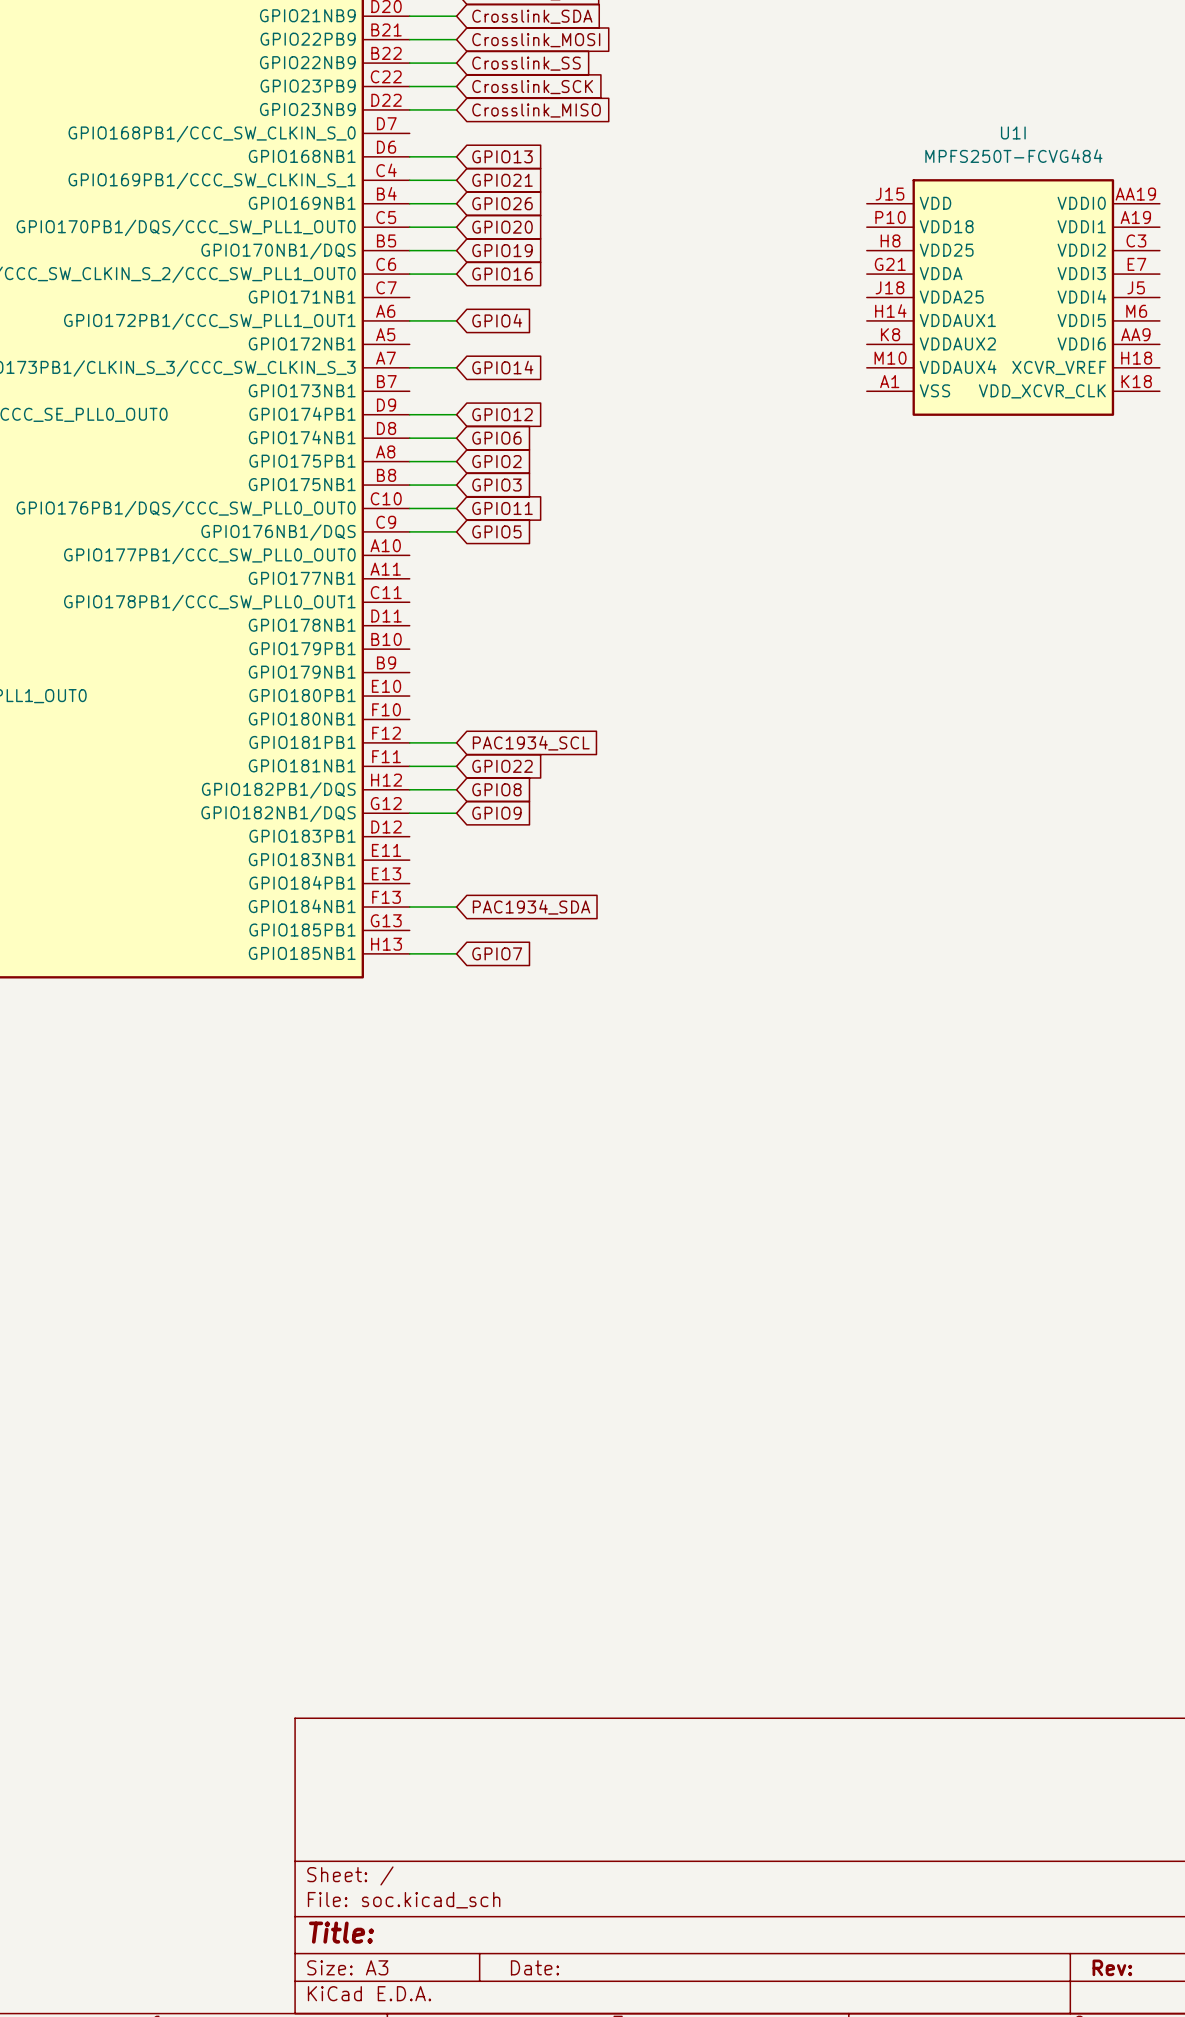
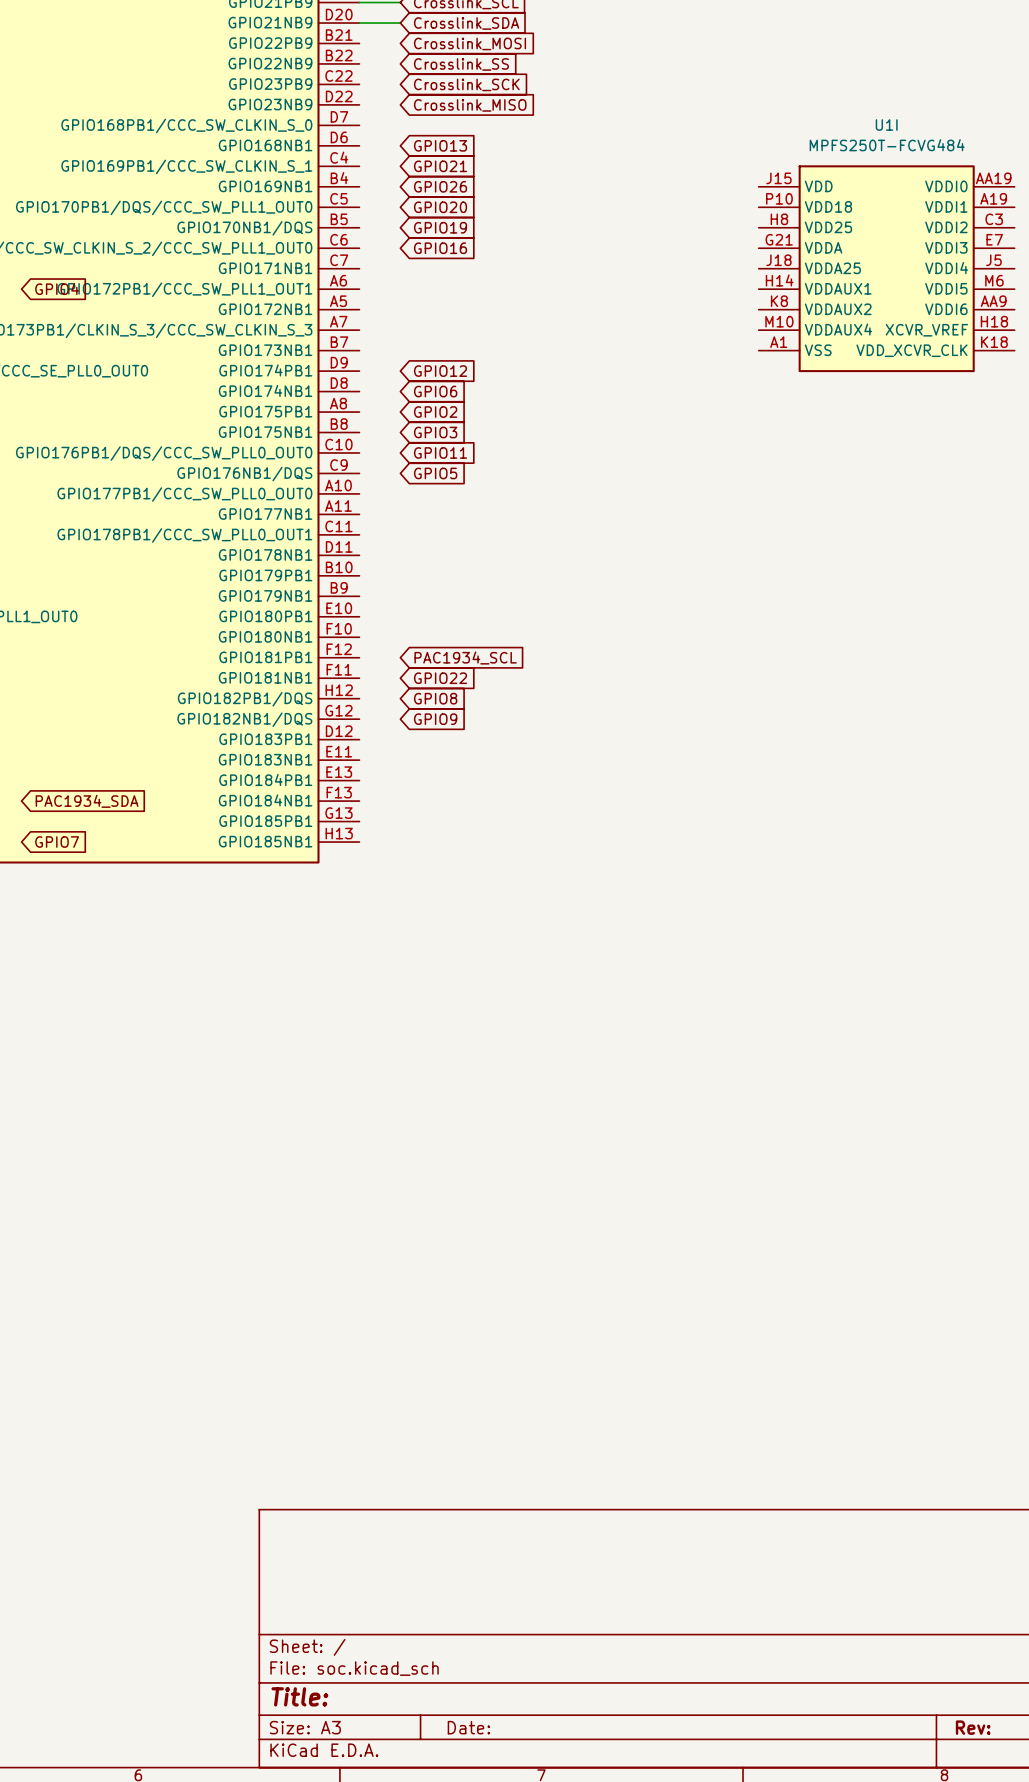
wire: (409, 39) (456, 39) -> none
wire: (409, 63) (456, 63) -> none
wire: (409, 86) (456, 86) -> none
wire: (409, 109) (456, 109) -> none
wire: (409, 156) (456, 156) -> none
wire: (409, 180) (456, 180) -> none
wire: (409, 203) (456, 203) -> none
wire: (409, 227) (456, 227) -> none
wire: (409, 250) (456, 250) -> none
wire: (409, 274) (456, 274) -> none
global label: none -> GPIO4 (57, 288)
wire: (409, 320) (456, 320) -> none
global label: GPIO4 (497, 320) -> none
wire: (409, 367) (456, 367) -> none
global label: GPIO14 (502, 367) -> none
wire: (409, 414) (456, 414) -> none
wire: (409, 438) (456, 438) -> none
wire: (409, 461) (456, 461) -> none
wire: (409, 485) (456, 485) -> none
wire: (409, 508) (456, 508) -> none
wire: (409, 531) (456, 531) -> none
wire: (409, 742) (456, 742) -> none
wire: (409, 766) (456, 766) -> none
wire: (409, 789) (456, 789) -> none
wire: (409, 813) (456, 813) -> none
global label: none -> PAC1934_SDA (87, 801)
wire: (409, 907) (456, 907) -> none
global label: PAC1934_SDA (531, 907) -> none
global label: none -> GPIO7 (57, 842)
wire: (409, 953) (456, 953) -> none
global label: GPIO7 (497, 953) -> none

